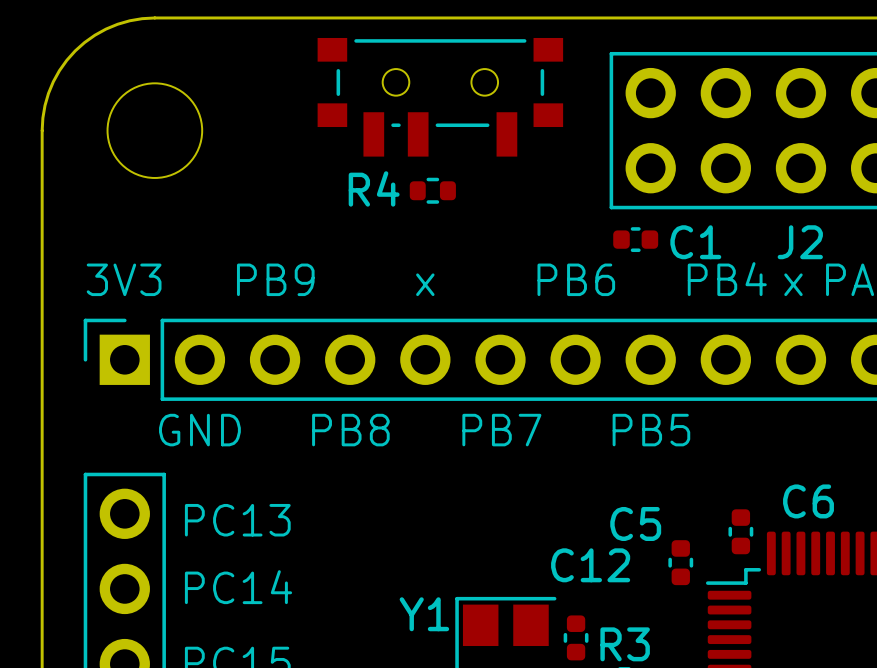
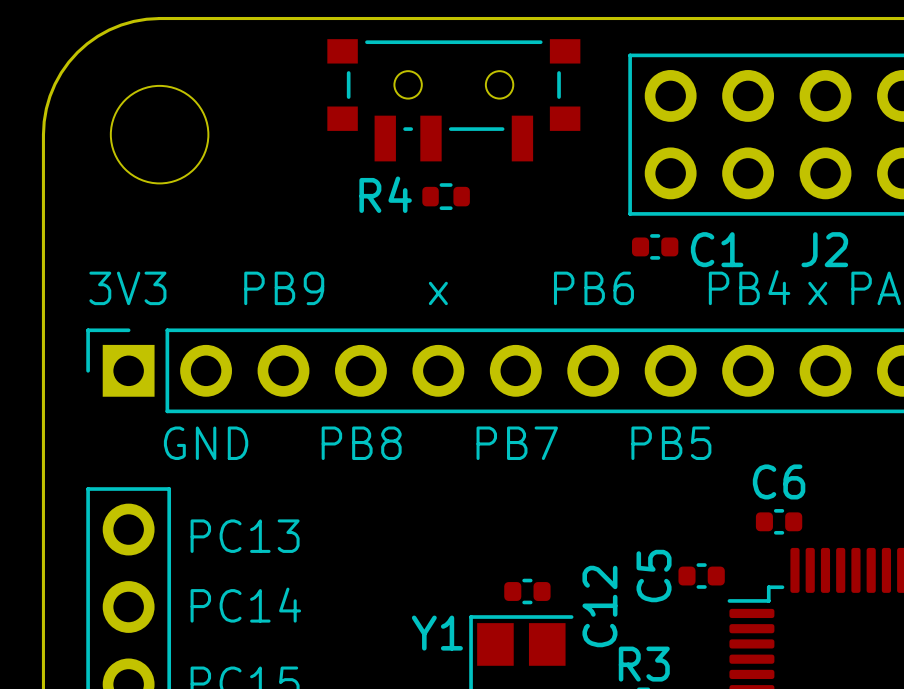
C6 name position: C6 (808, 501) -> C6 (779, 481)
C6 rotation: 0° (740, 531) -> 90° clockwise (779, 521)
C6 position: (740, 531) -> (779, 521)
C5 rotation: 0° (680, 562) -> 90° clockwise (701, 576)
C12 rotation: 0° (576, 637) -> 90° clockwise (527, 591)
C12 position: (576, 637) -> (527, 591)

